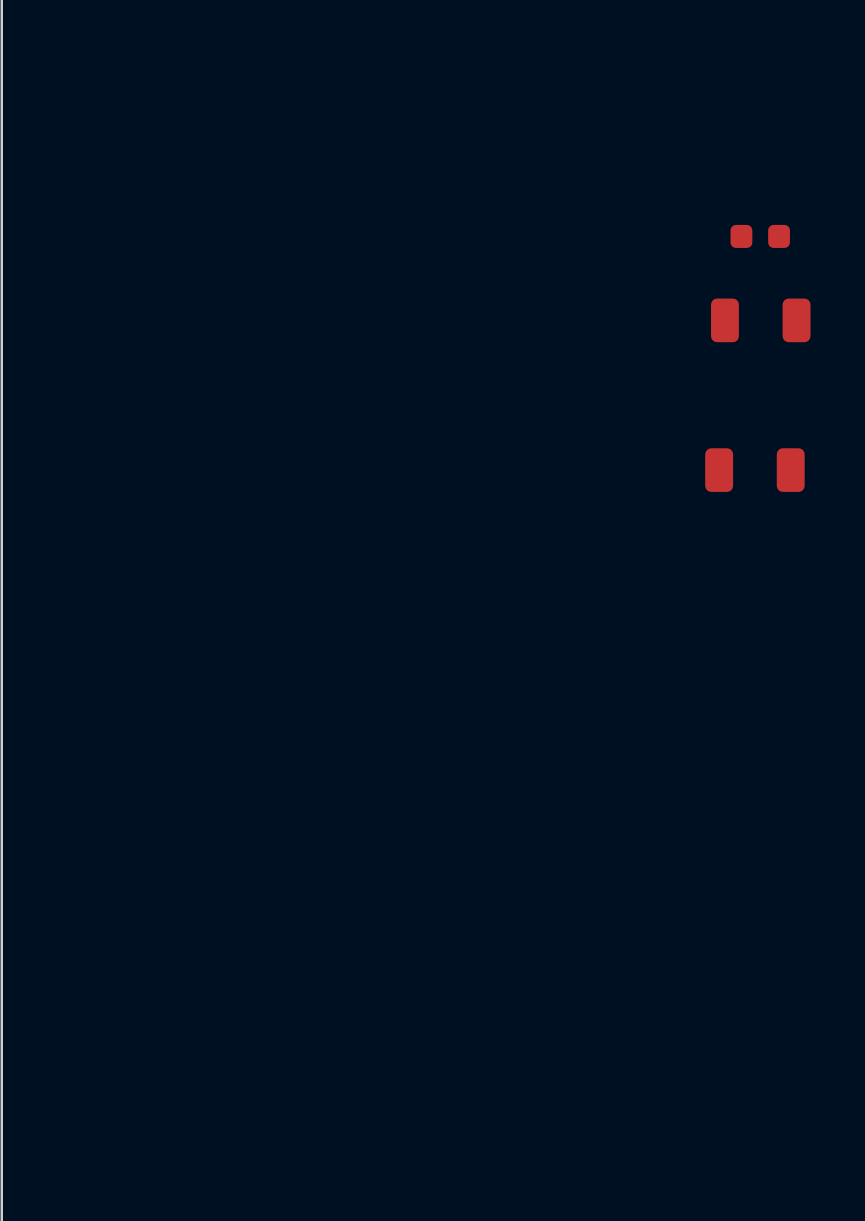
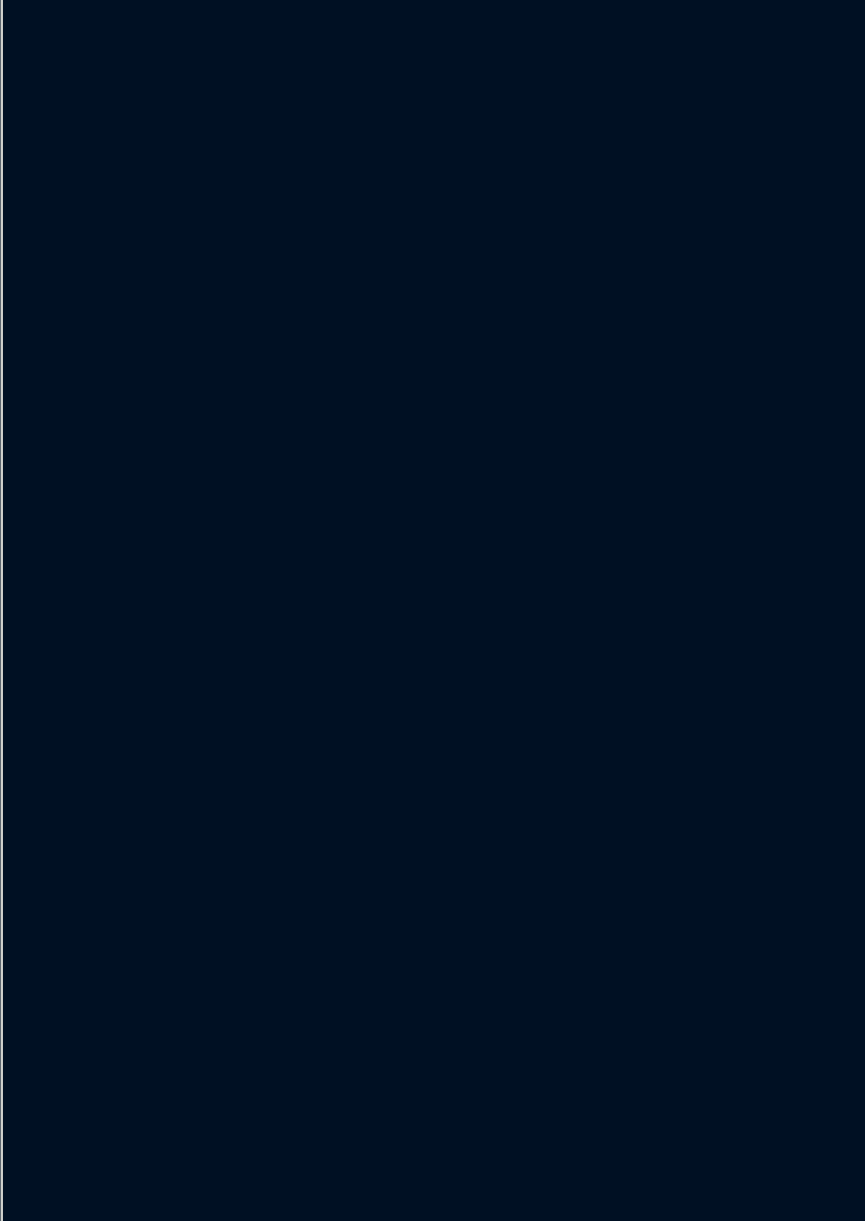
part: (760, 236) -> none
part: (760, 320) -> none
part: (754, 470) -> none

